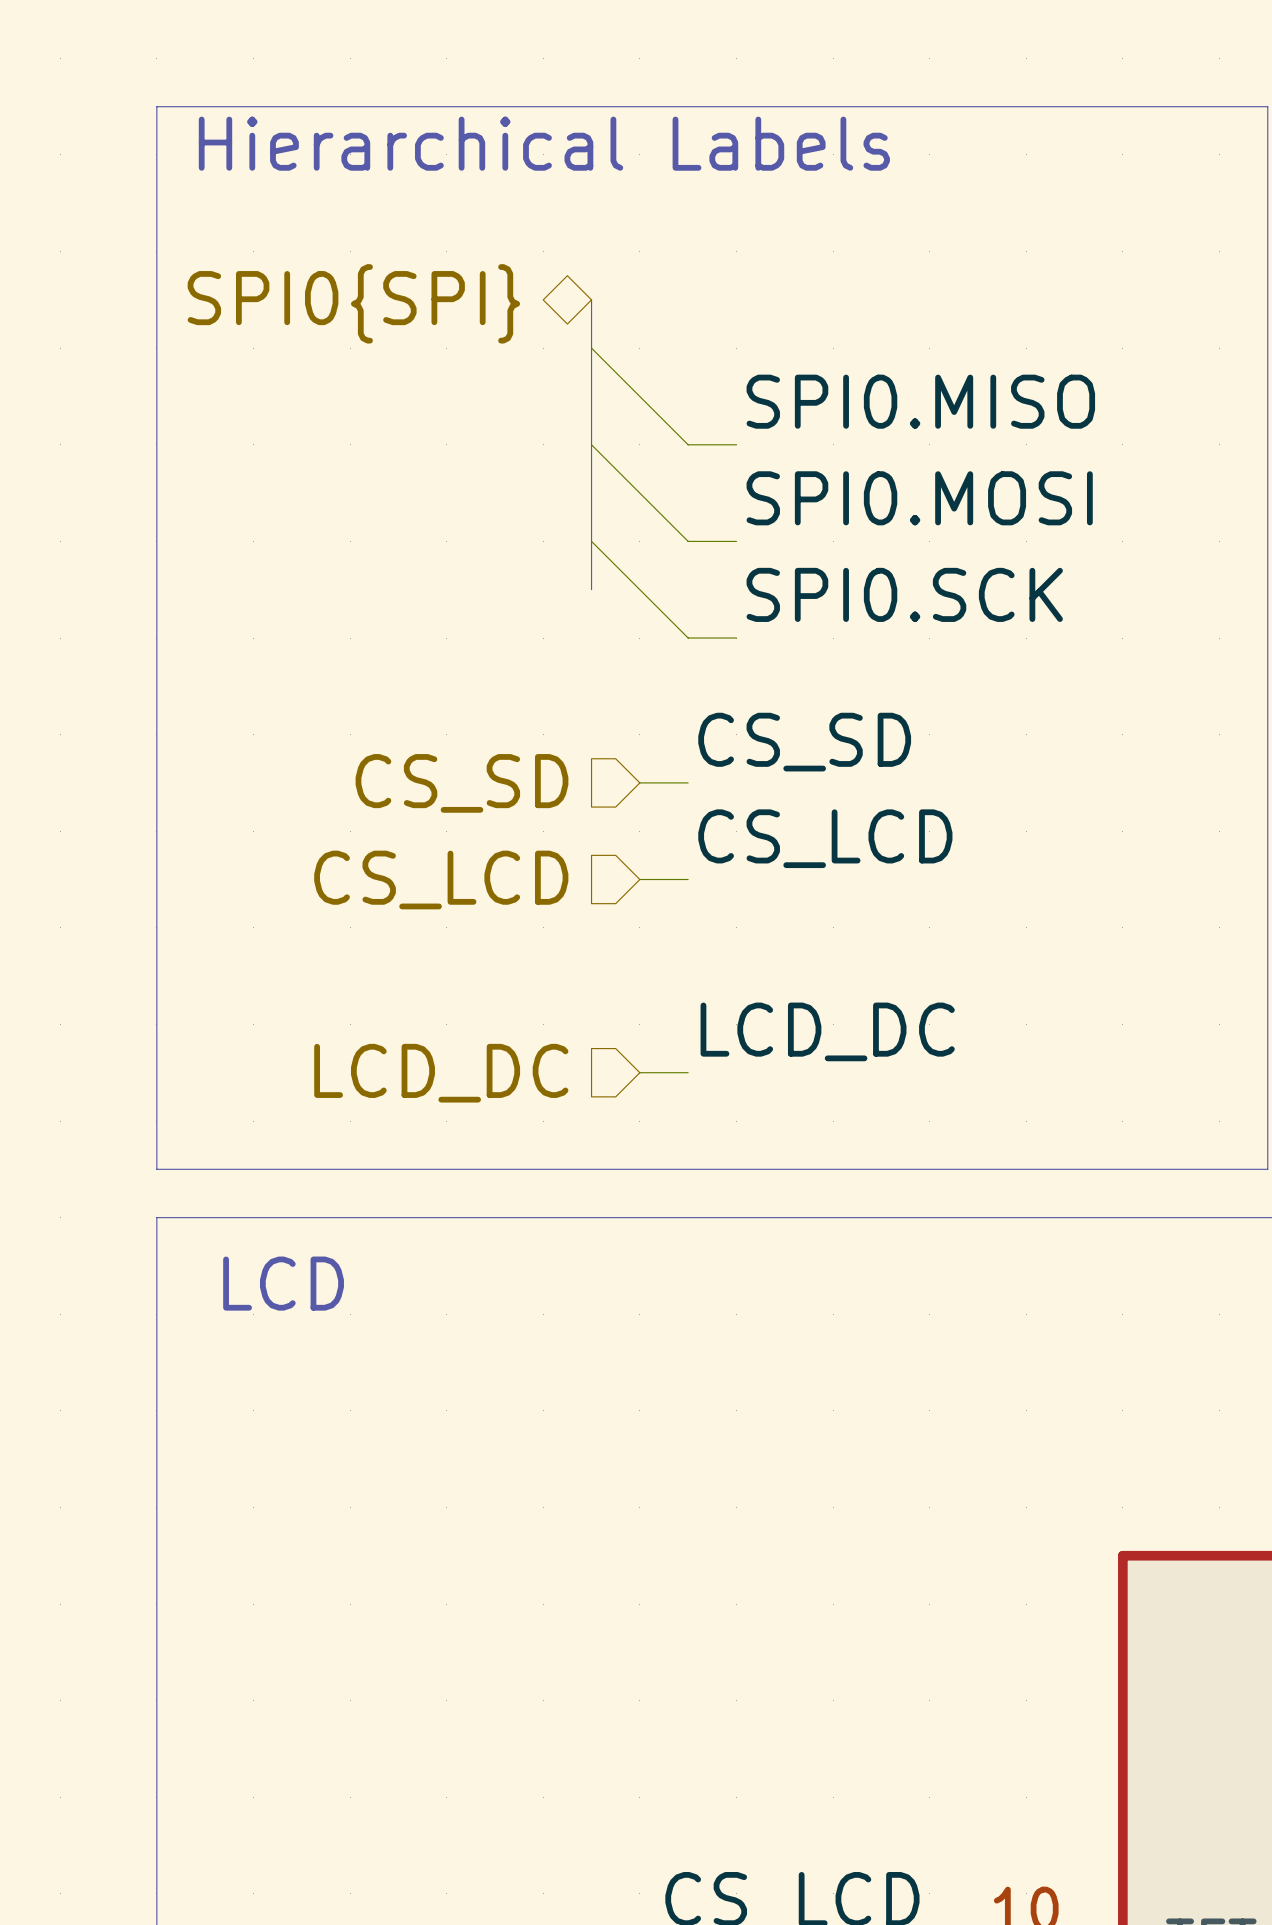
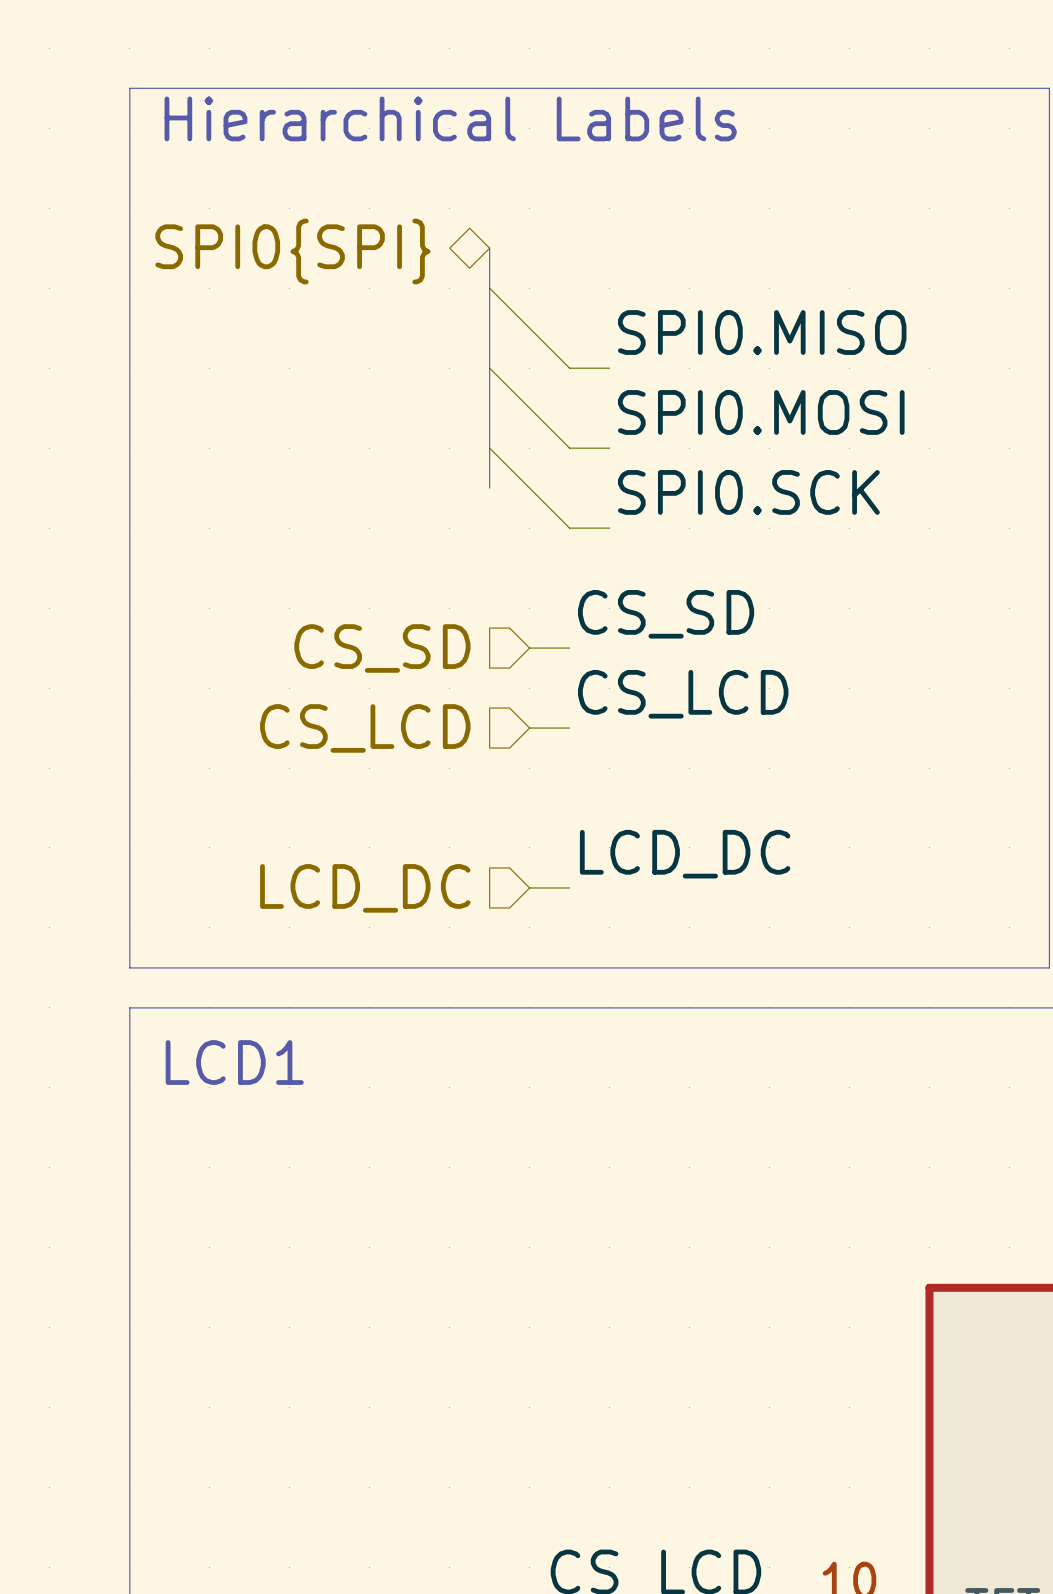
text: LCD (283, 1283) -> LCD1 (234, 1062)

